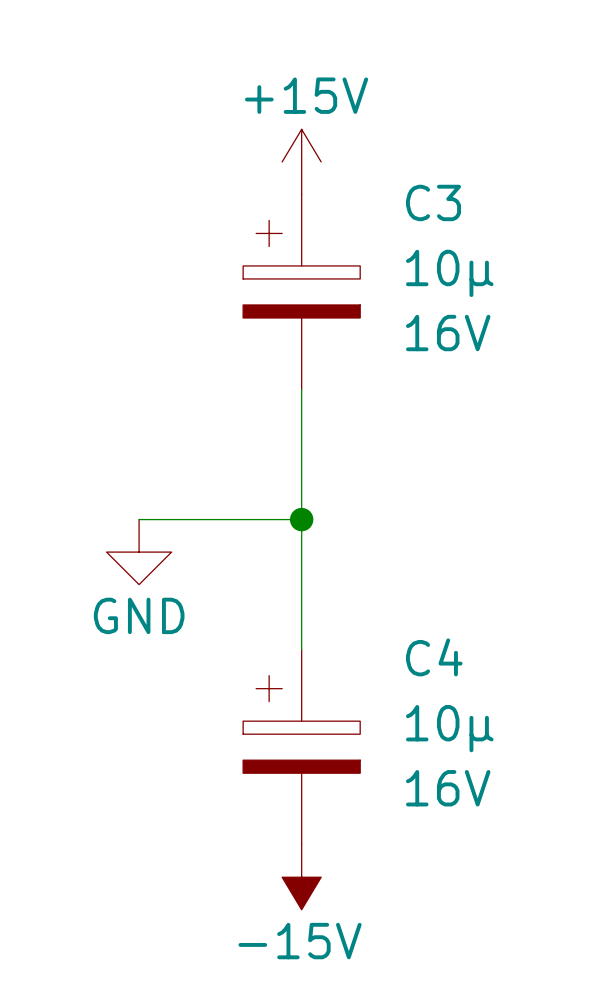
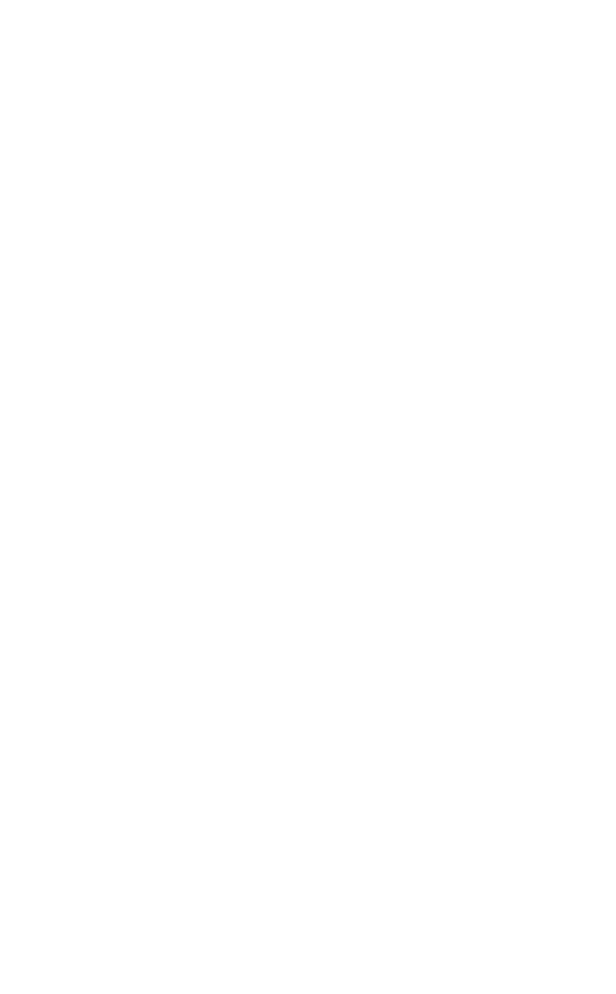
power symbol: +15V (301, 161) -> none
C3: 10µ (301, 291) -> none
wire: (301, 389) (301, 649) -> none
wire: (139, 519) (301, 519) -> none
junction: (301, 519) -> none
power symbol: GND (139, 552) -> none
C4: 10µ (301, 747) -> none
power symbol: -15V (301, 877) -> none

